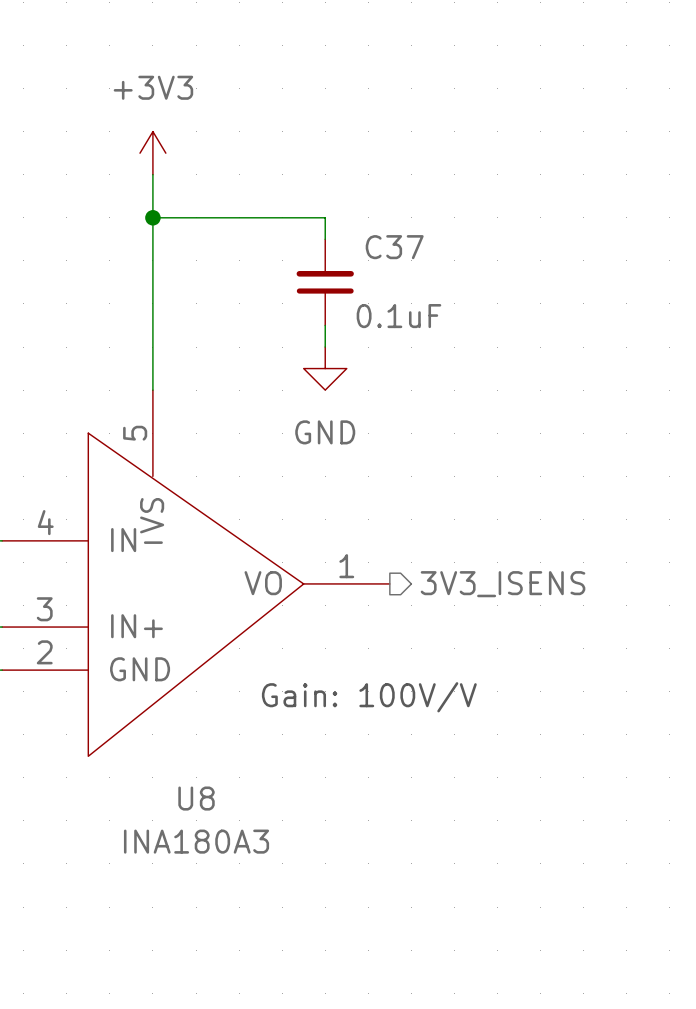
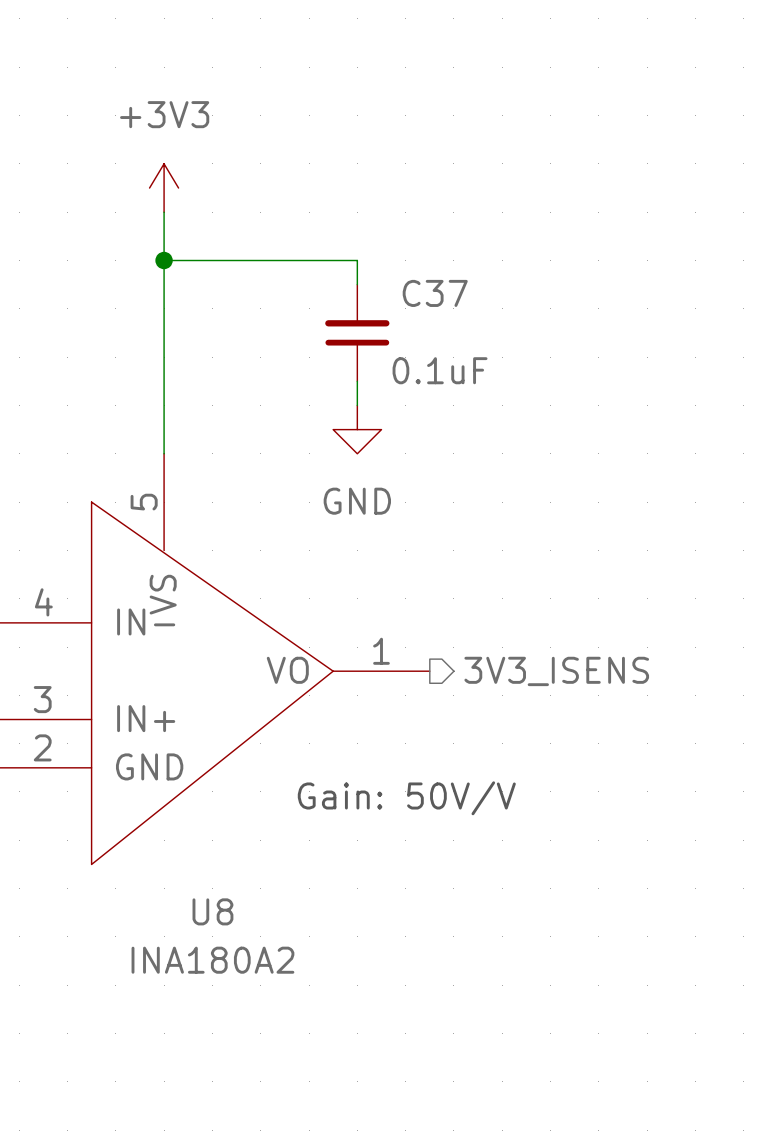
text: Gain: 100V/V (369, 697) -> Gain: 50V/V (406, 798)
U8 value: INA180A3 (196, 841) -> INA180A2 (212, 960)

